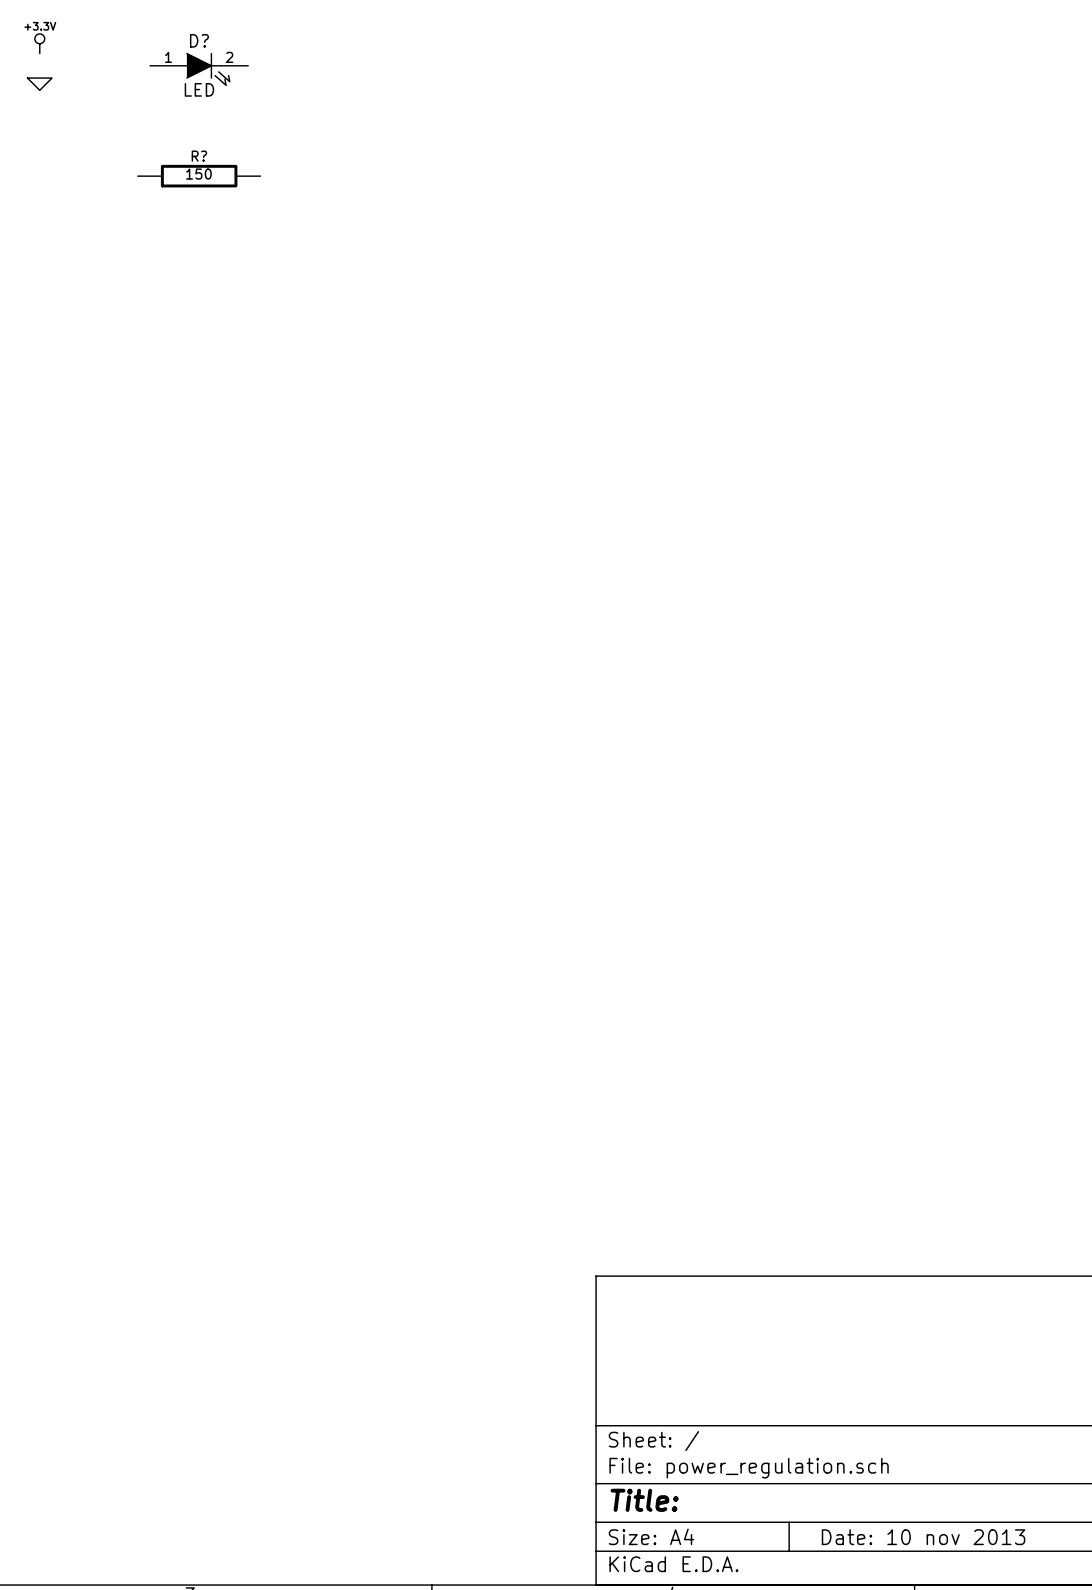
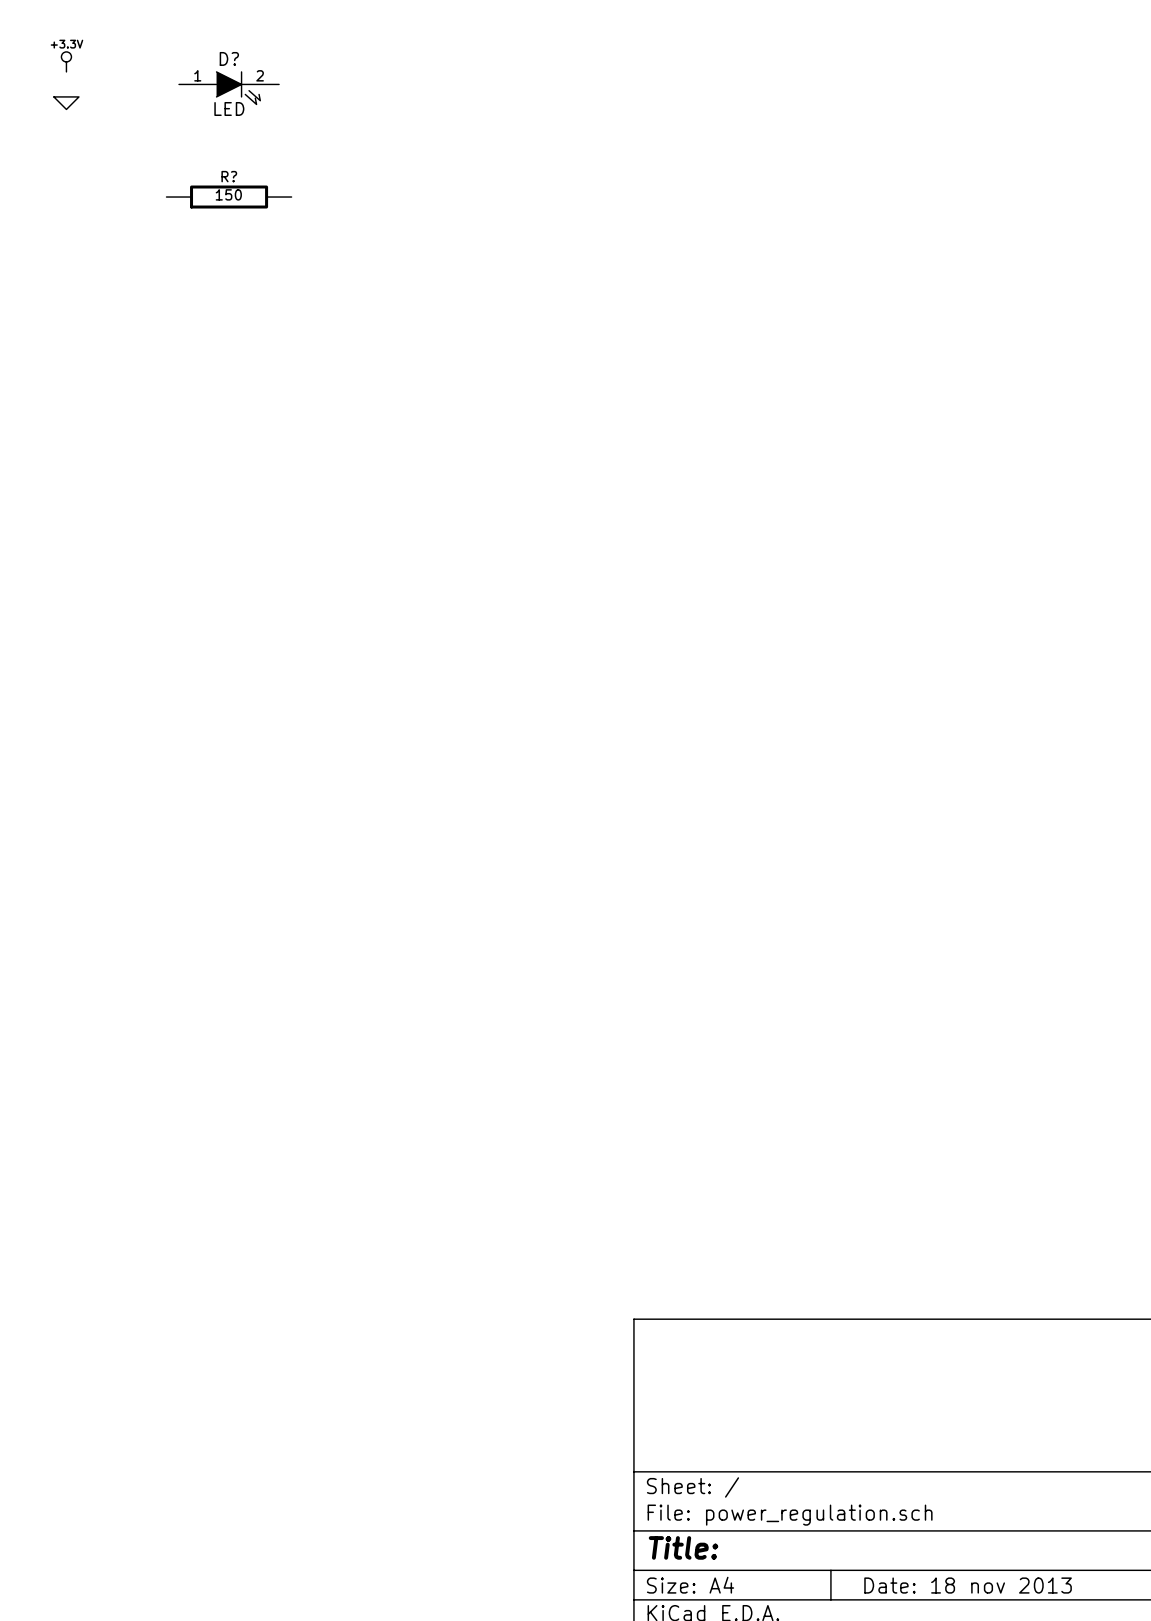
title block: Date: 10 nov 2013 (923, 1537) -> Date: 18 nov 2013 (968, 1585)

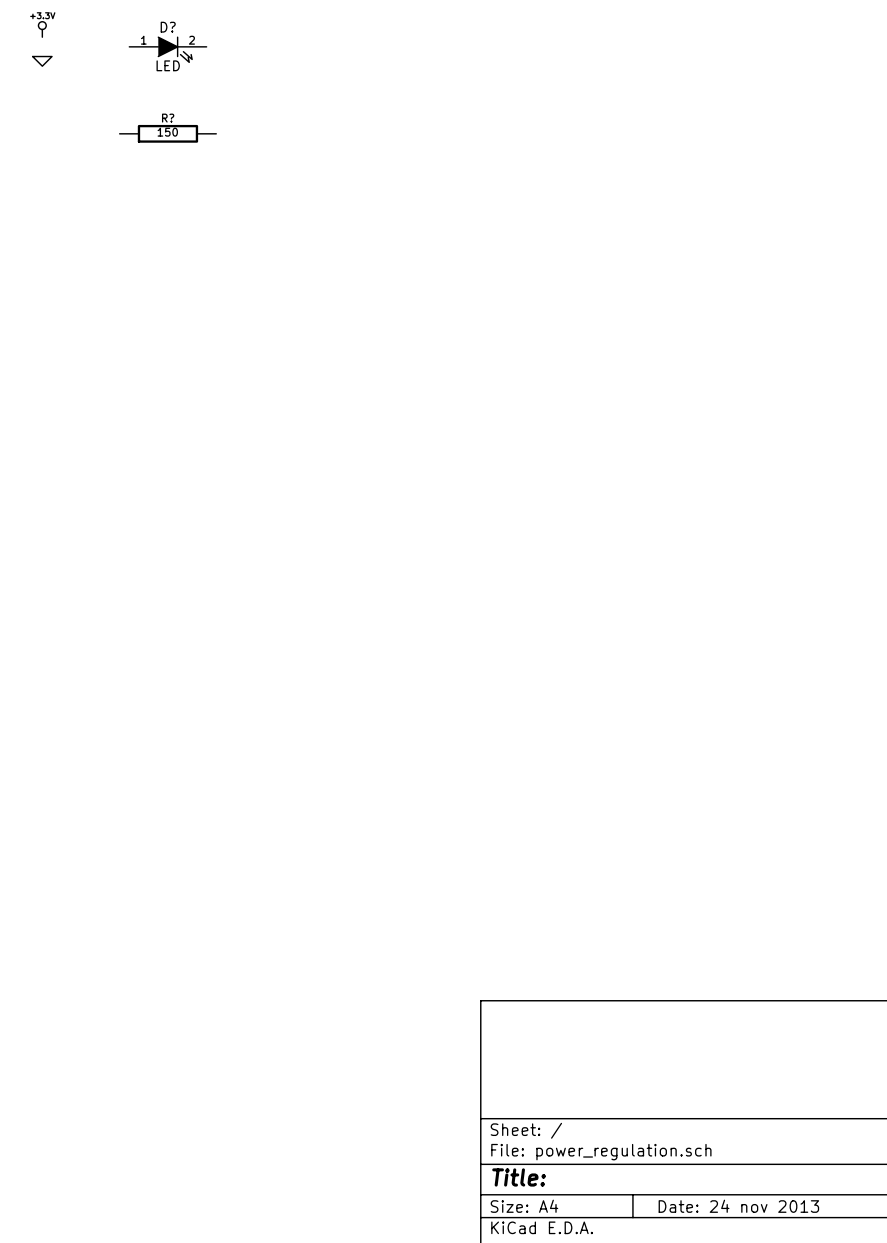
title block: Date: 18 nov 2013 (968, 1585) -> Date: 24 nov 2013 (738, 1206)

